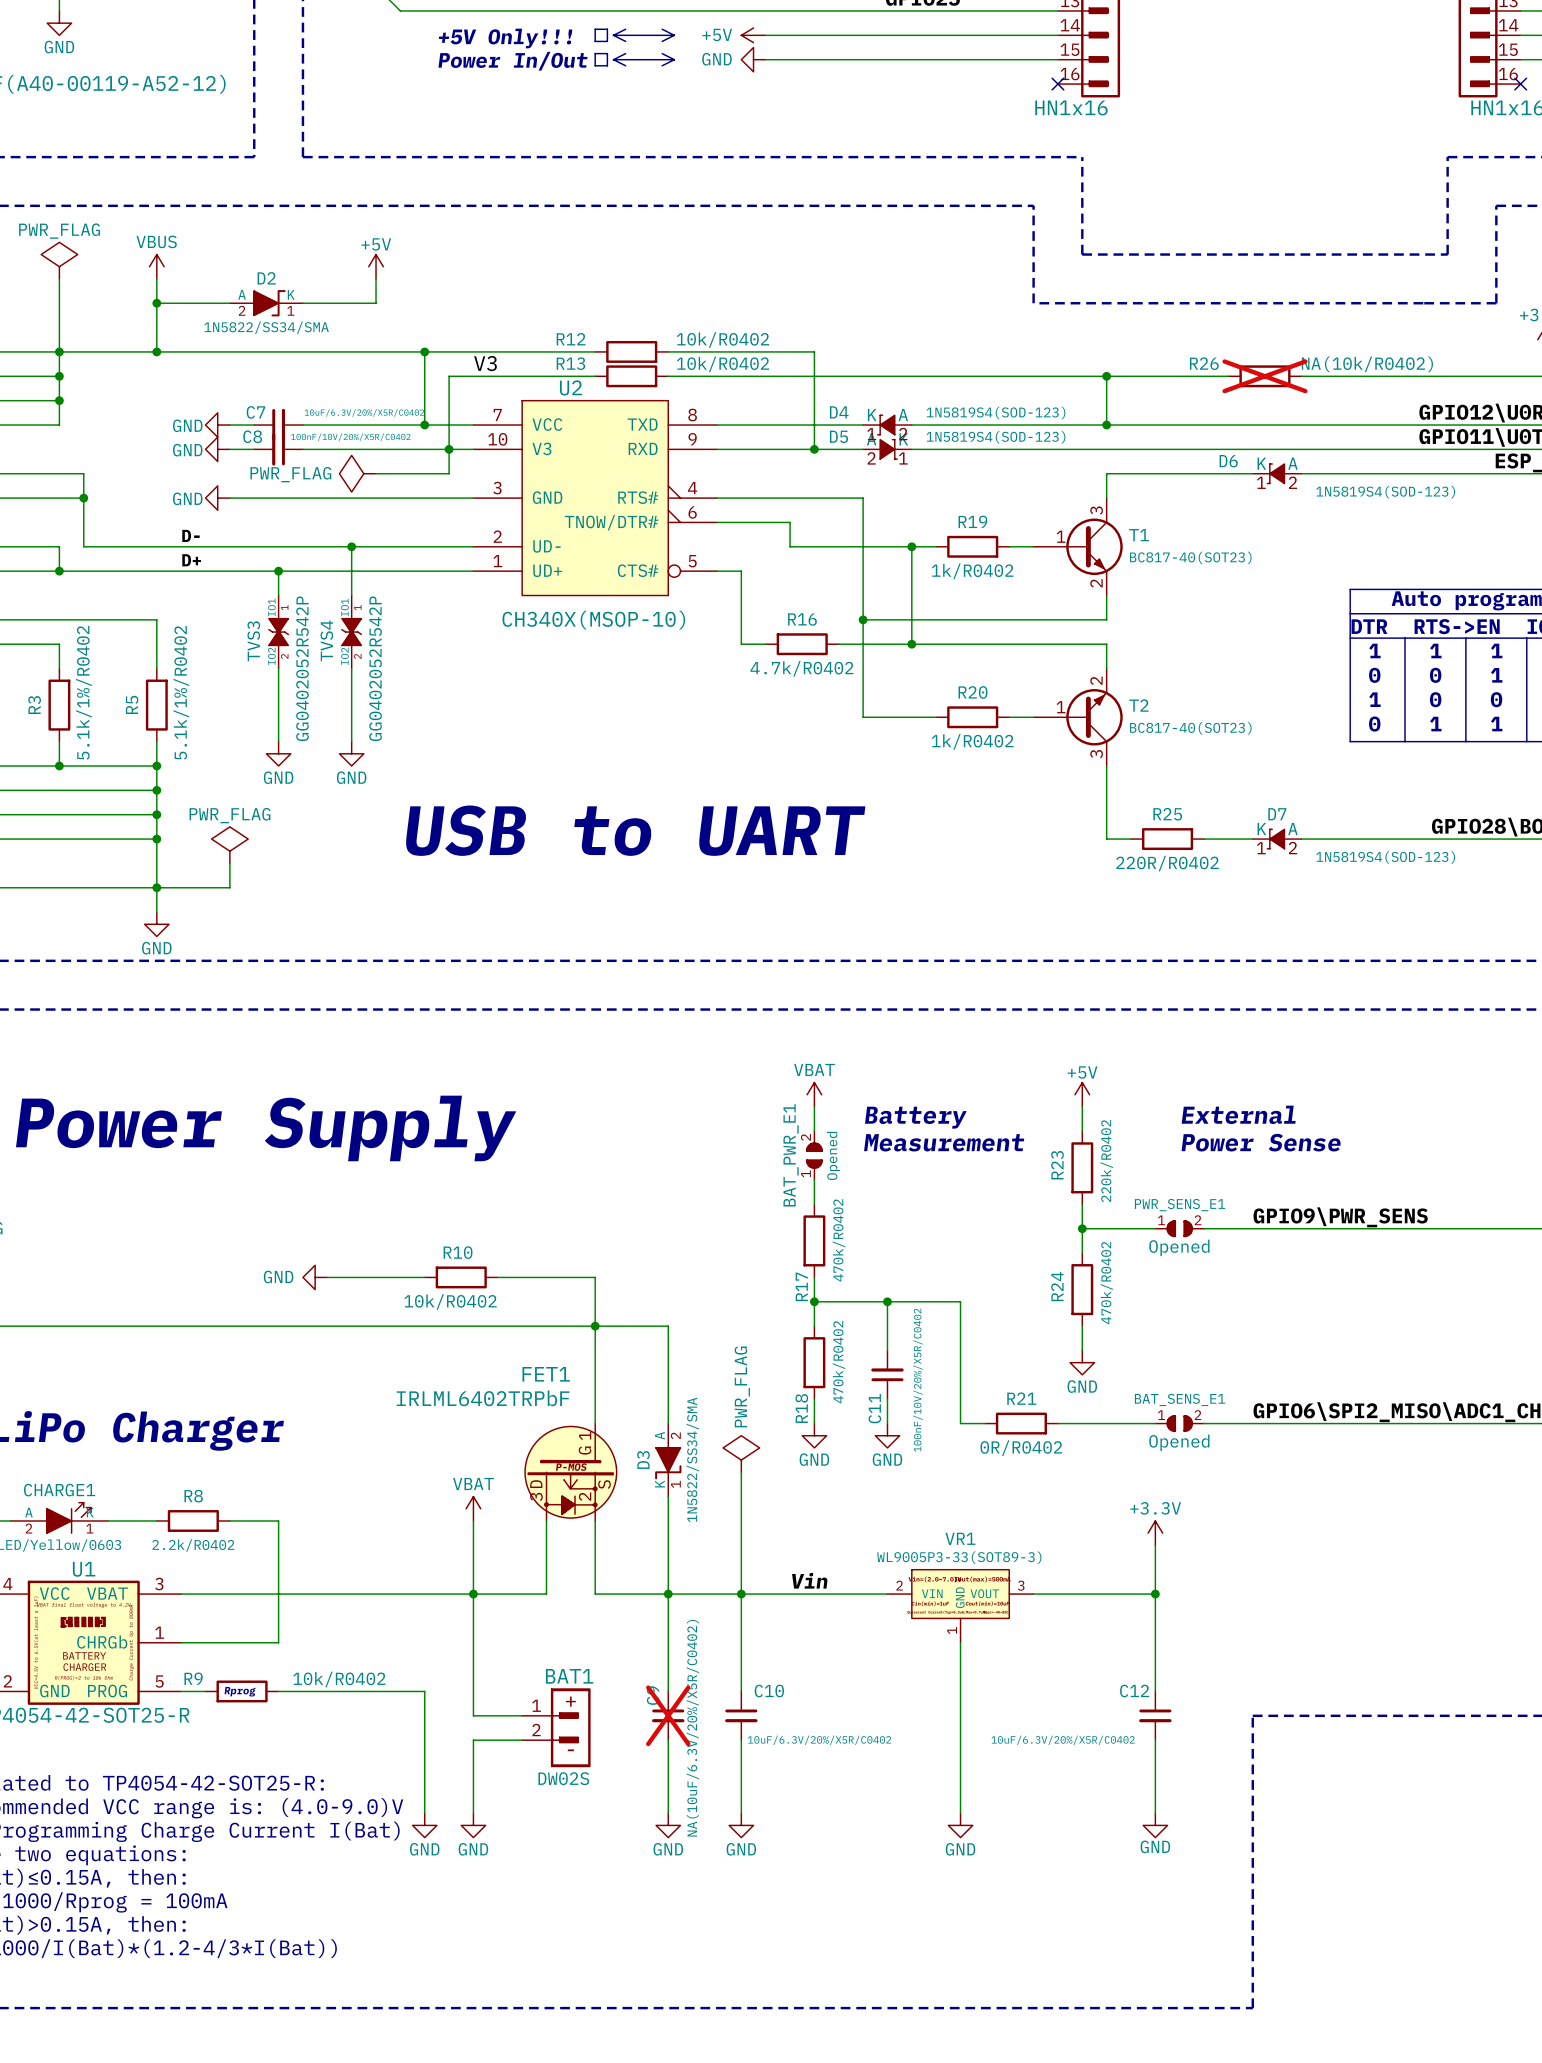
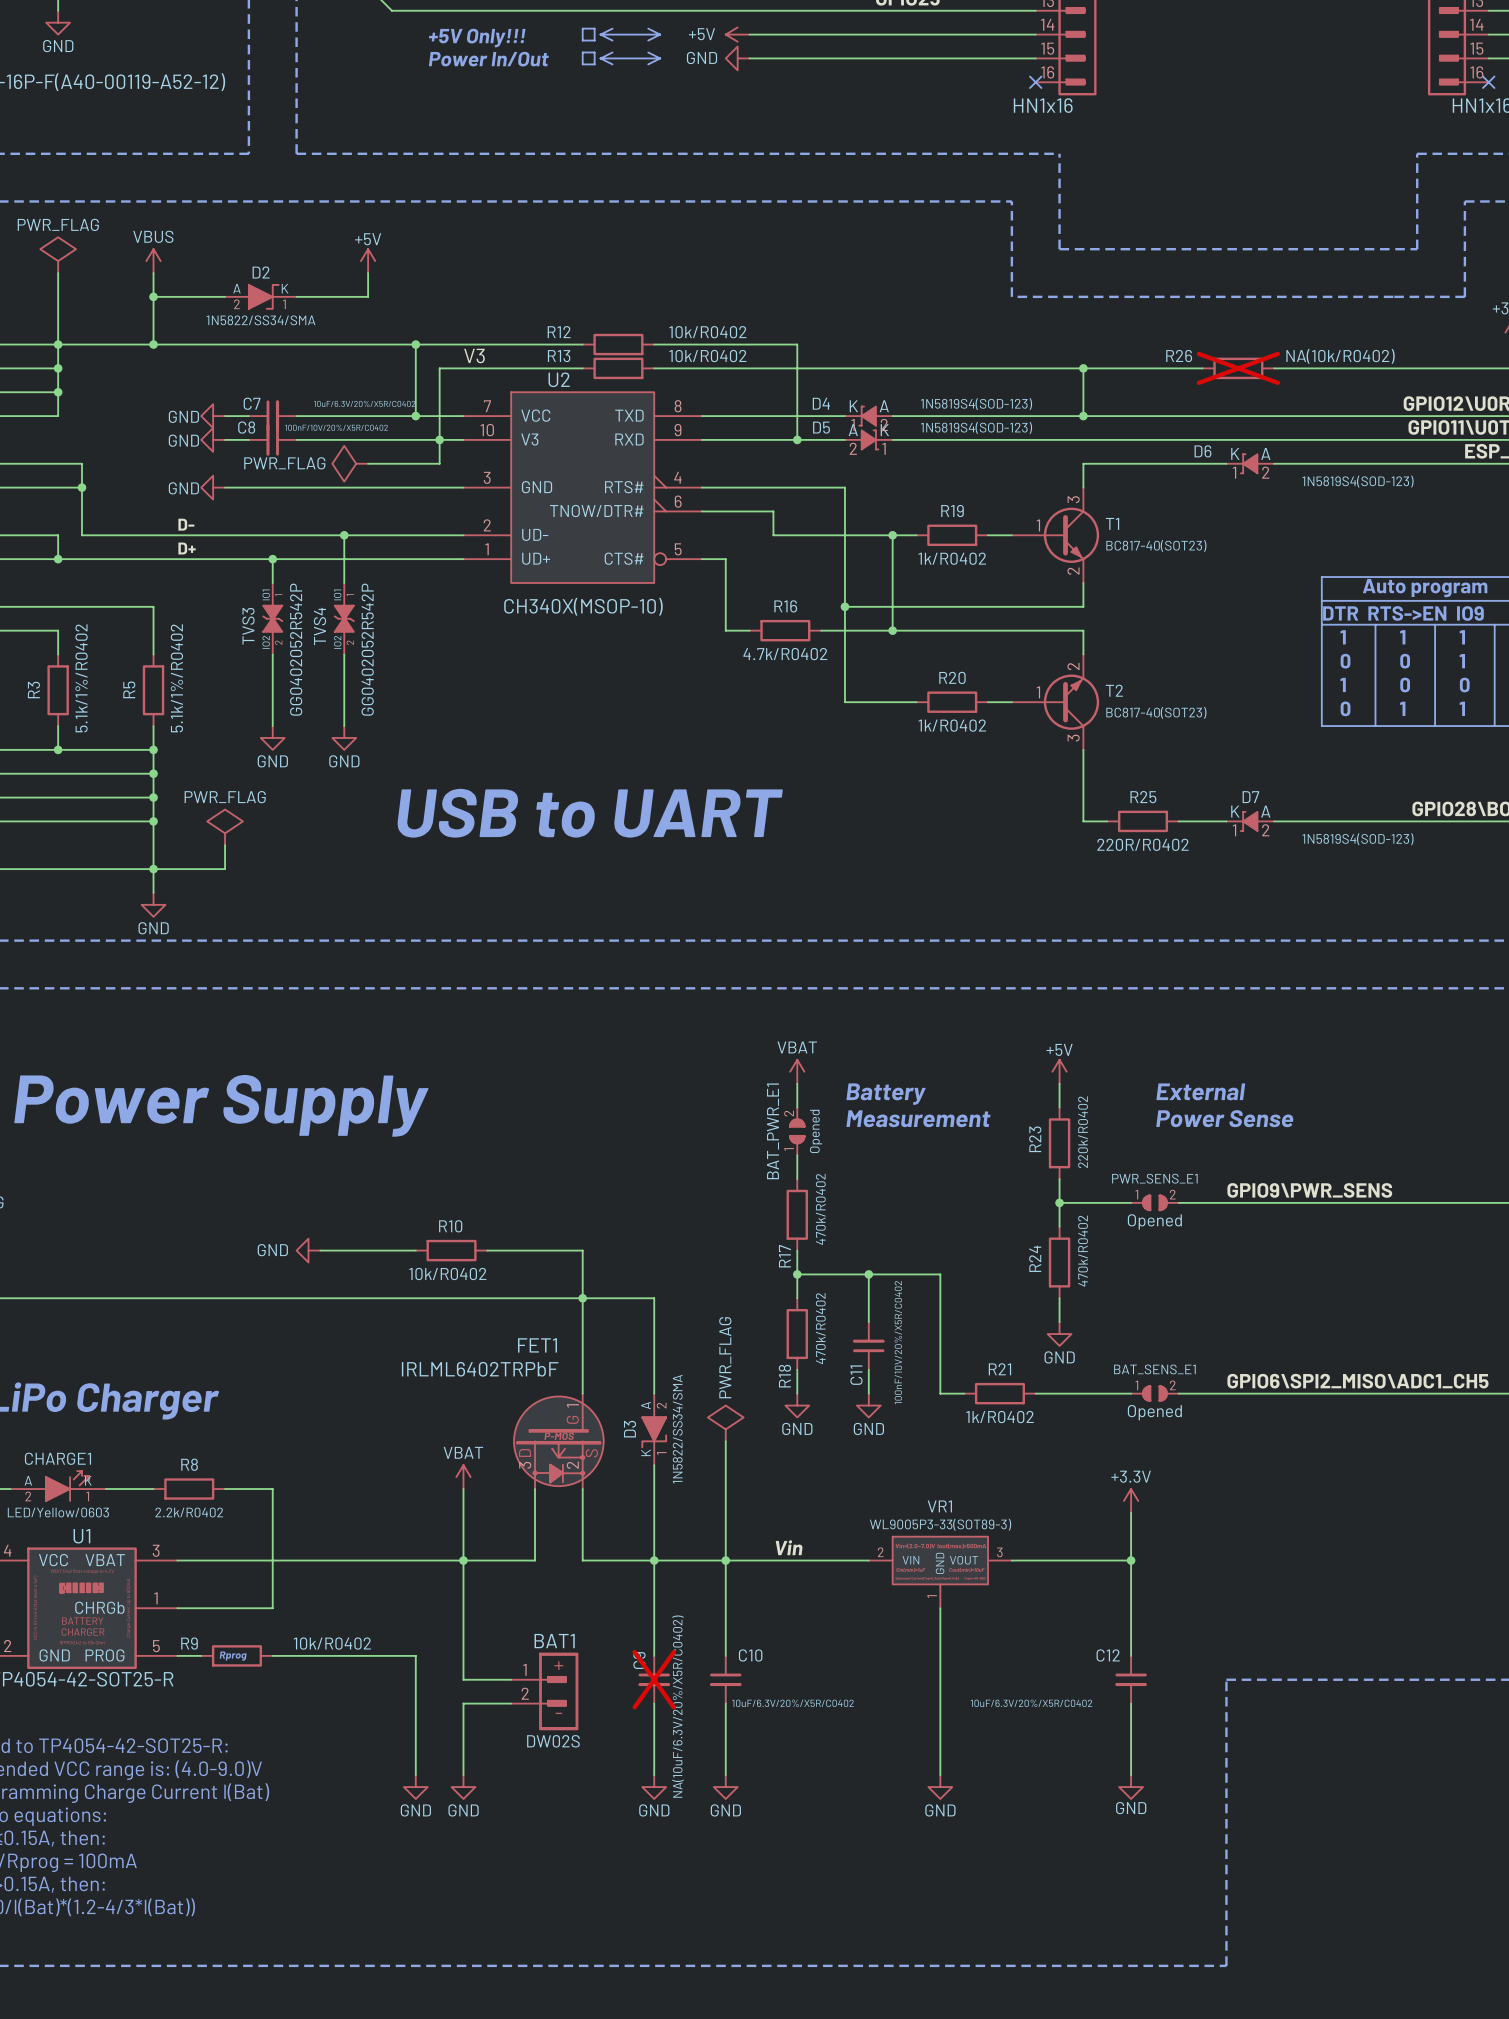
R21 value: 0R/R0402 (1021, 1448) -> 1k/R0402 (999, 1417)

